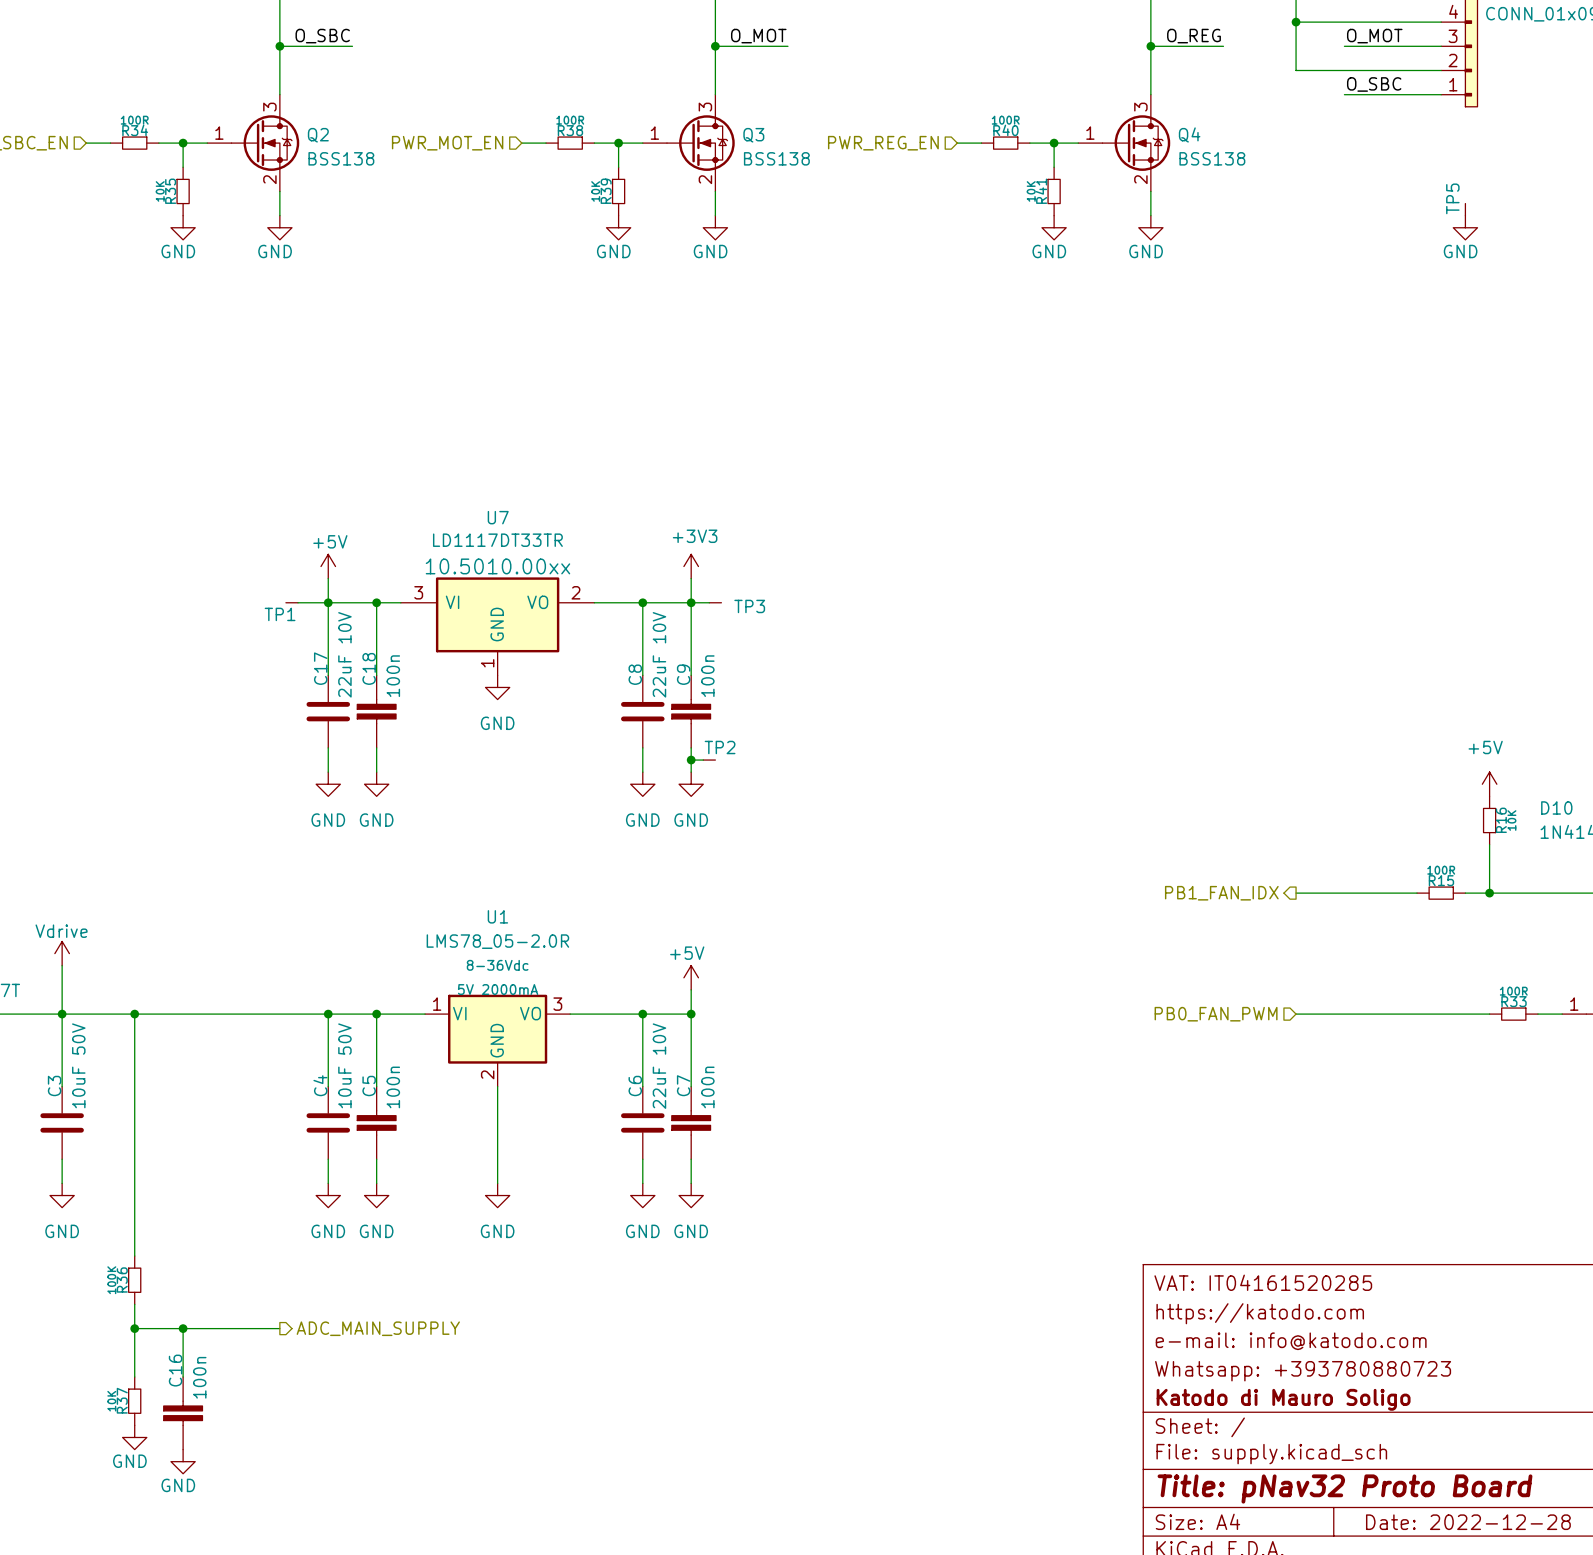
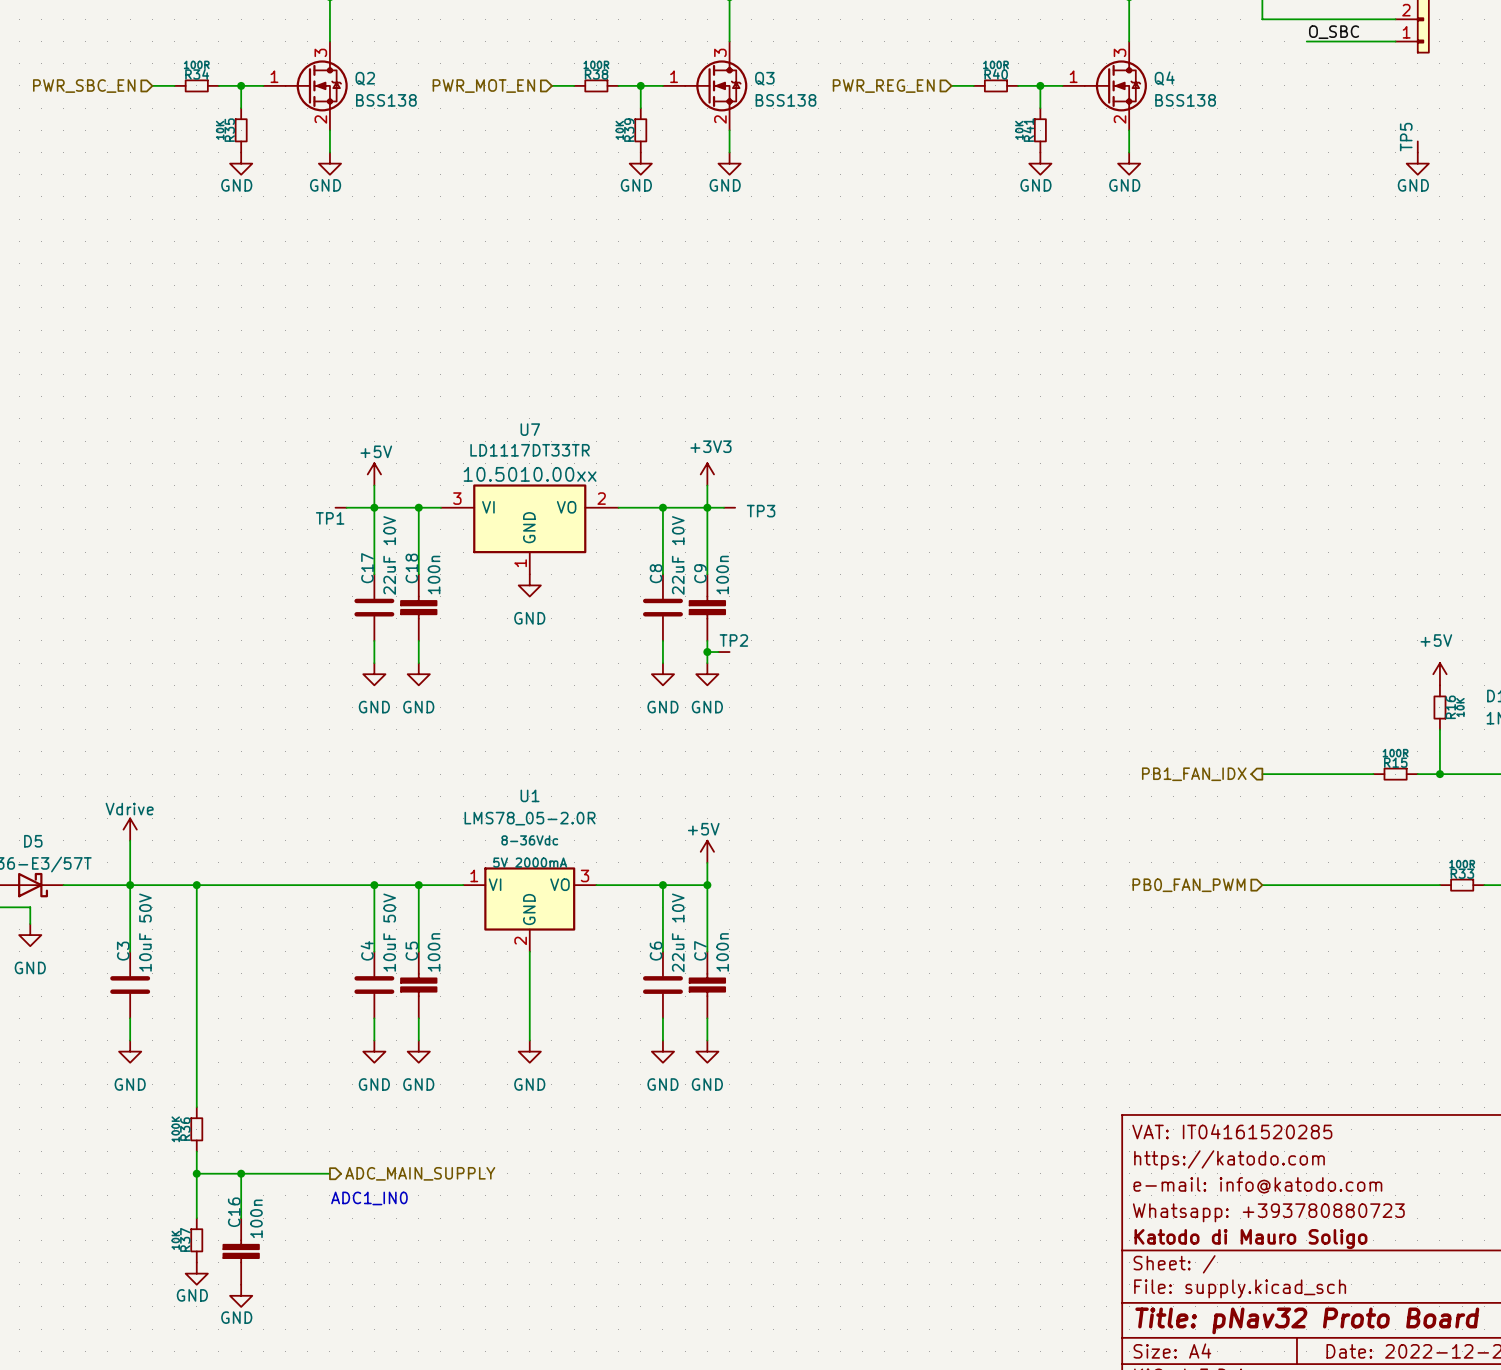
text: none -> ADC1_IN0 (369, 1198)

